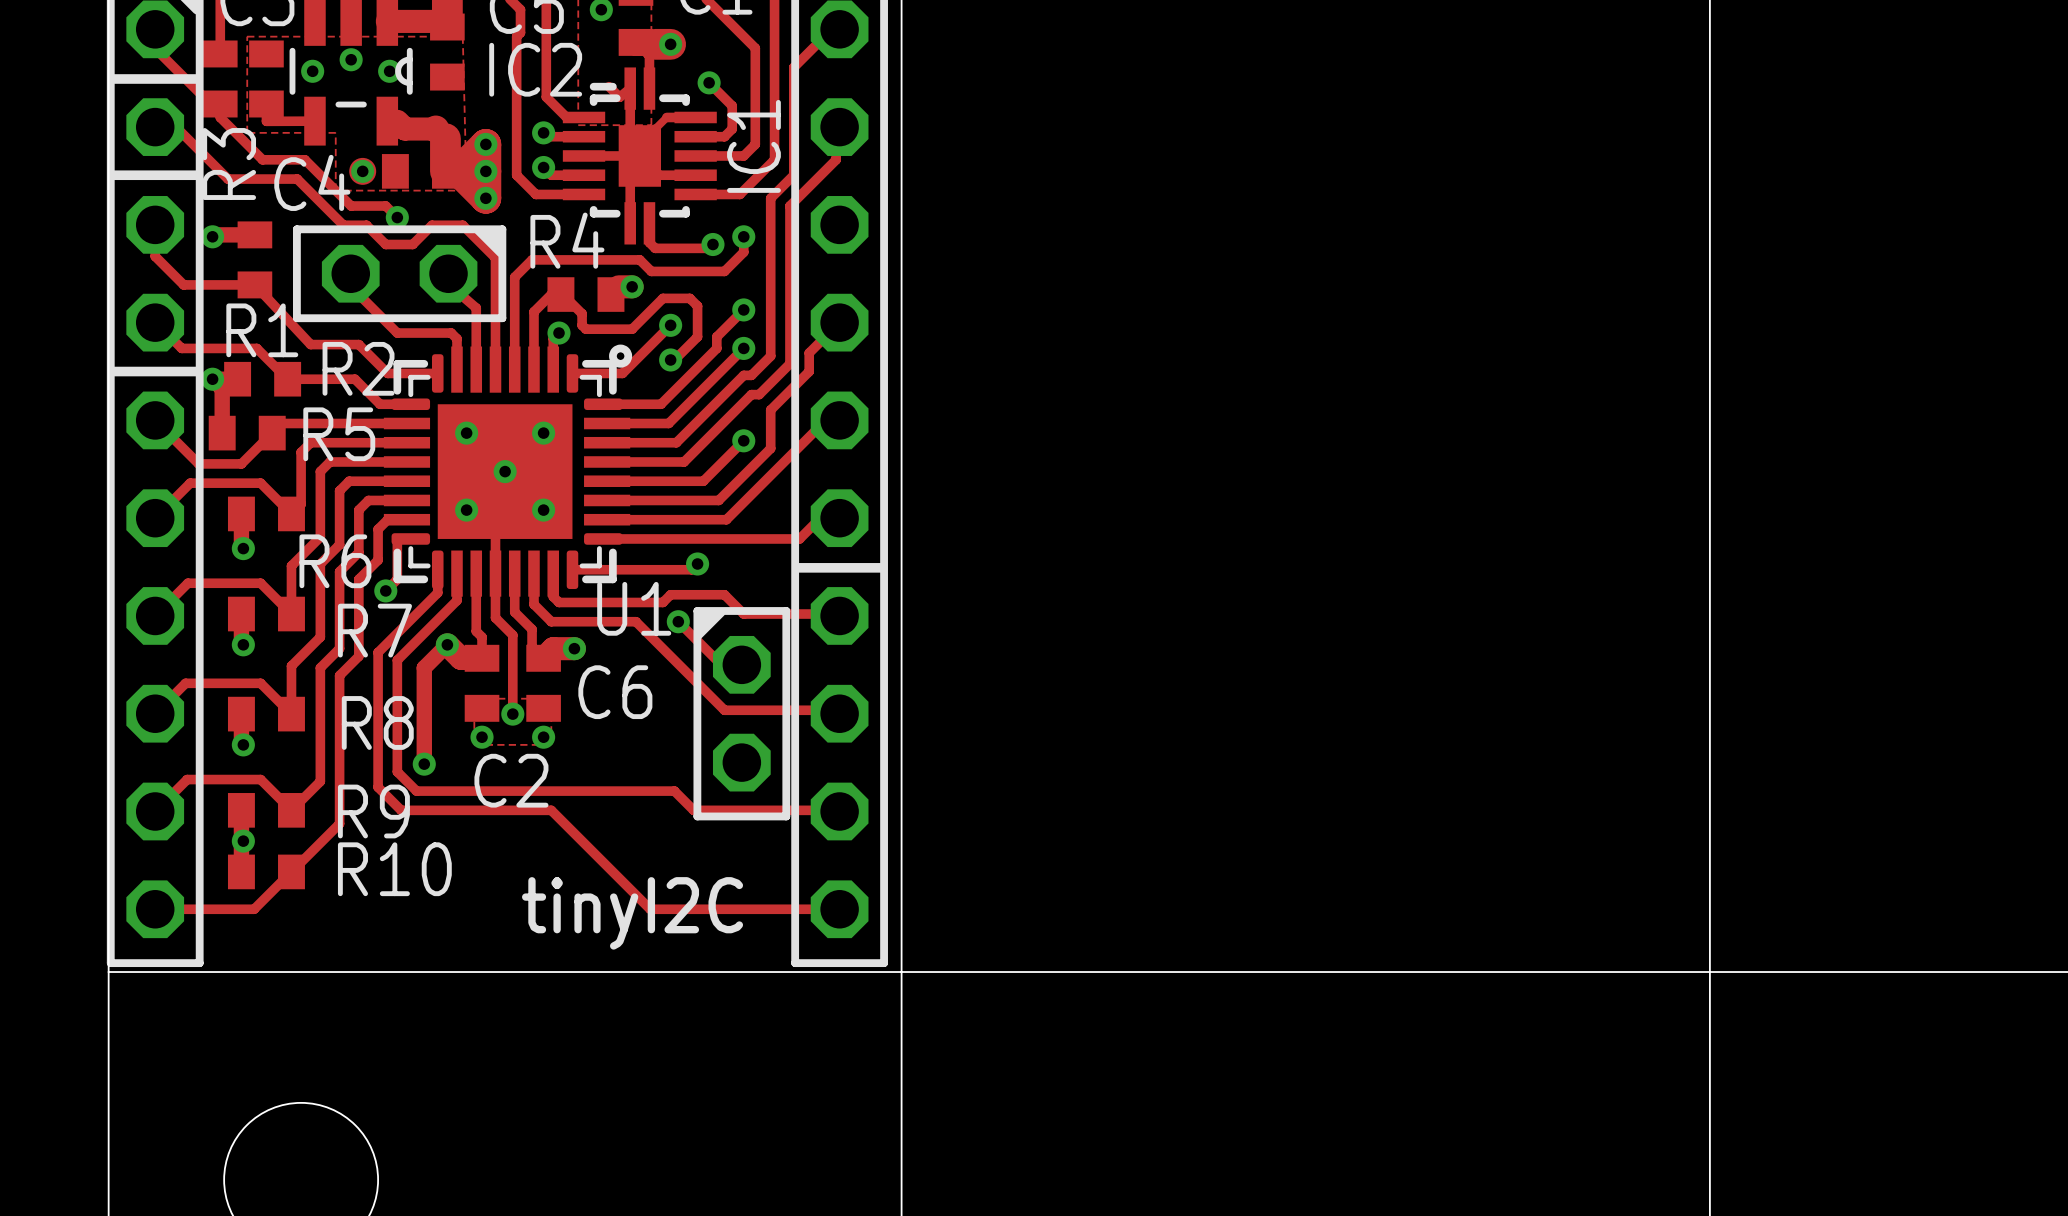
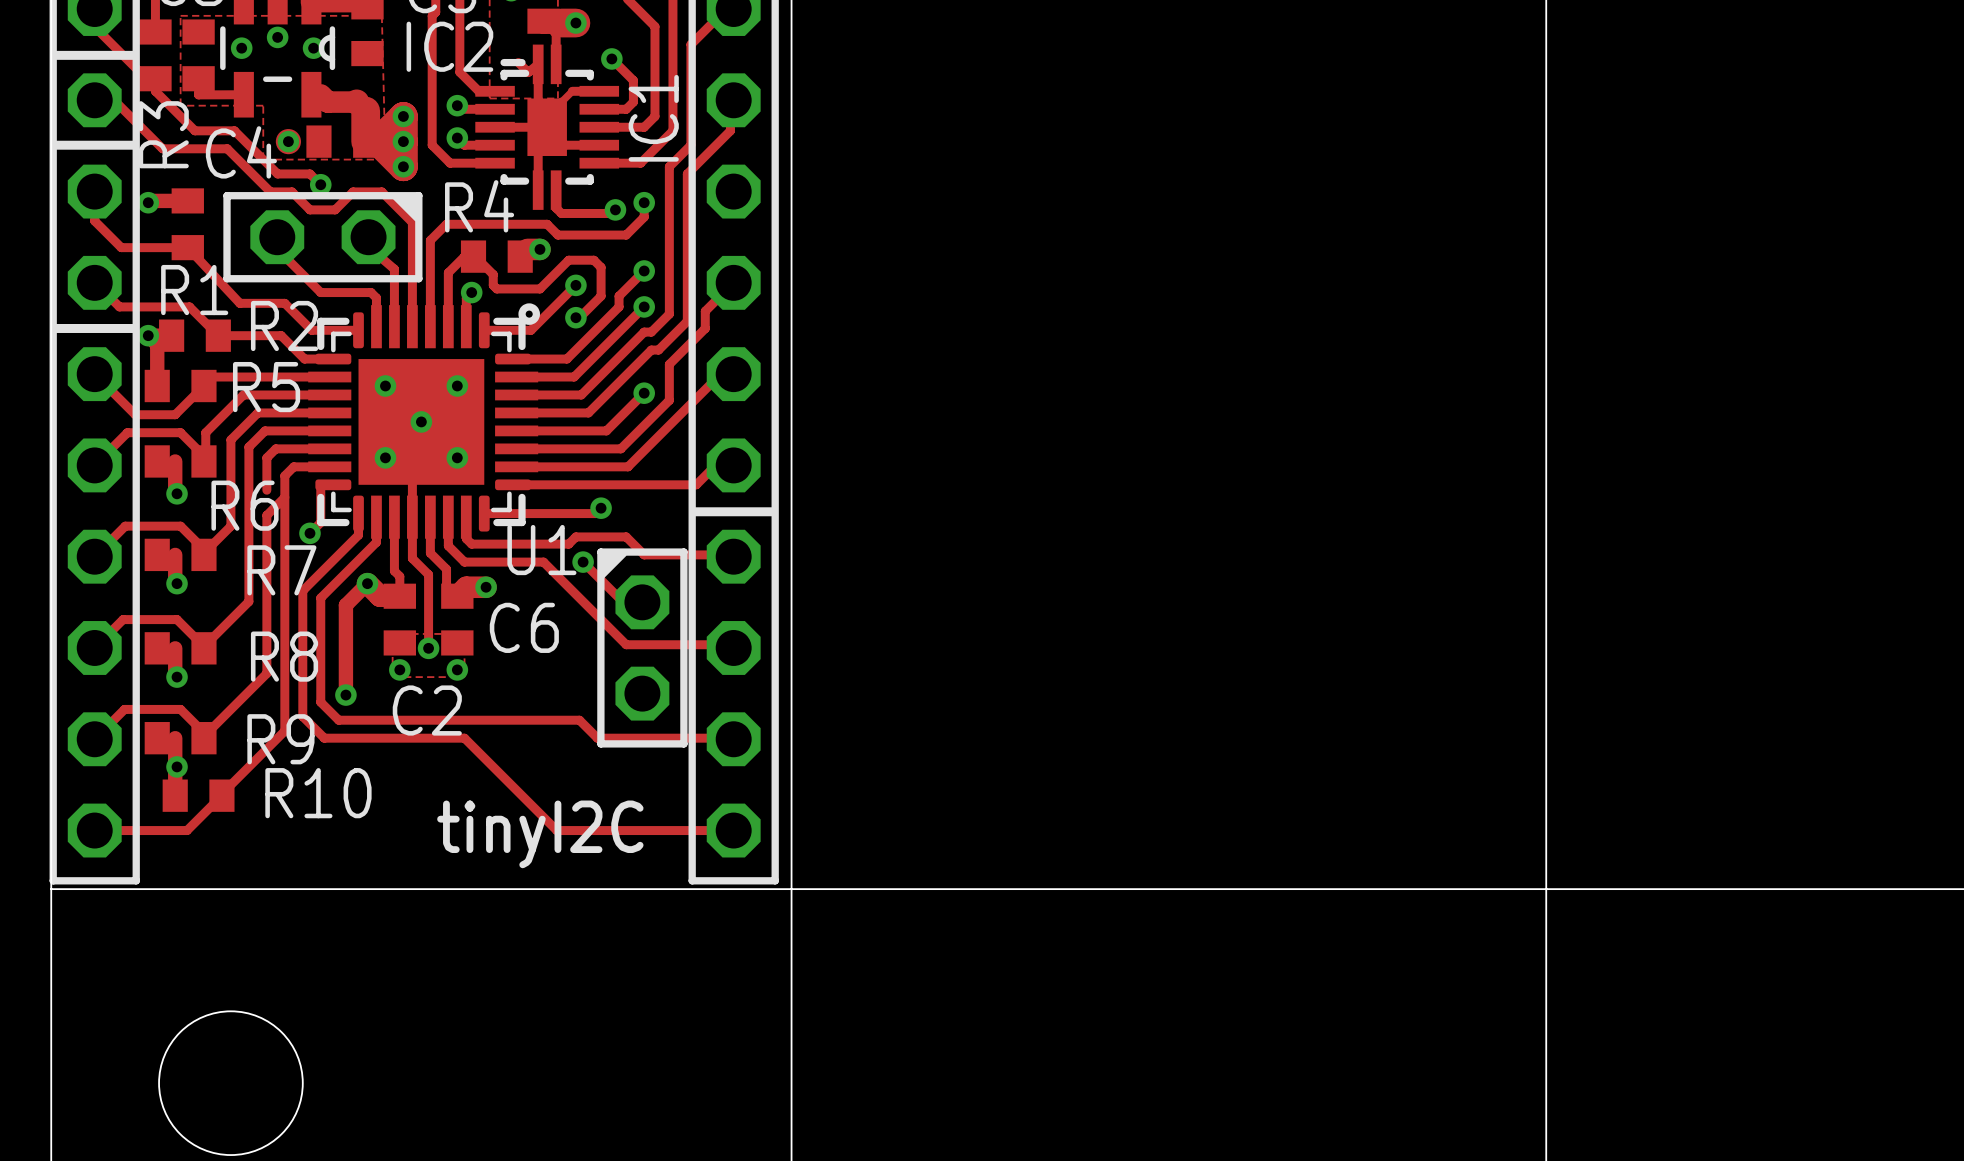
track: (314, 442) (310, 442) (301, 452) (301, 490) -> (243, 394) (205, 432) (205, 459) (203, 461) (203, 456) (180, 432)
track: (320, 471) (320, 498) -> (248, 421) (230, 439)
track: (349, 481) (339, 490) (339, 510) -> (275, 430) (265, 430) (248, 447)
track: (247, 483) (260, 483) (291, 513) (301, 504) -> none
track: (368, 500) (358, 510) (358, 529) -> (293, 448) (275, 448) (266, 457)
R6 position: (266, 513) -> (180, 461)
track: (387, 519) (378, 529) (378, 560) (358, 579) -> (284, 497) (284, 522)
track: none -> (311, 466) (293, 466) (284, 475)
track: (320, 537) (291, 565) (291, 614) (260, 583) (247, 583) -> (230, 452) (230, 526) (203, 554) (203, 549) (180, 526)
track: (339, 544) (320, 563) -> (248, 483) (248, 508)
R7 position: (266, 614) -> (180, 554)
track: (320, 637) (291, 665) (291, 714) (260, 683) (243, 683) -> (248, 576) (248, 601) (203, 648) (177, 619)
track: (339, 648) (320, 667) (320, 781) (291, 810) (260, 779) (247, 779) -> (266, 673) (203, 738) (203, 732) (180, 709)
track: (358, 656) (339, 675) -> (266, 587) (266, 612)
R8 position: (266, 714) -> (180, 648)
track: (339, 741) (339, 823) (293, 870) -> (284, 594) (284, 730) (223, 793)
R9 position: (266, 810) -> (180, 738)

